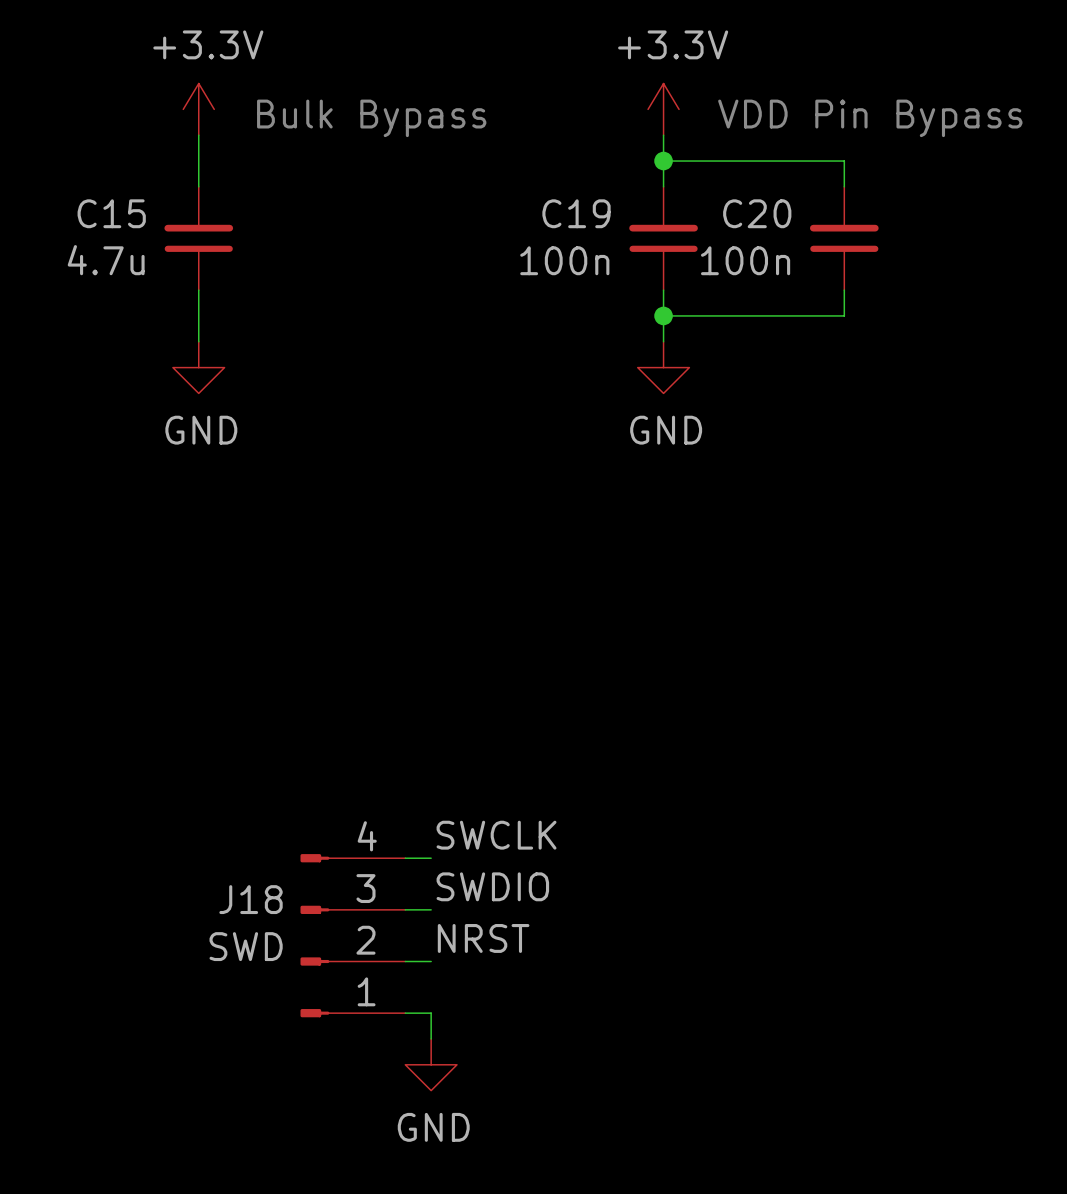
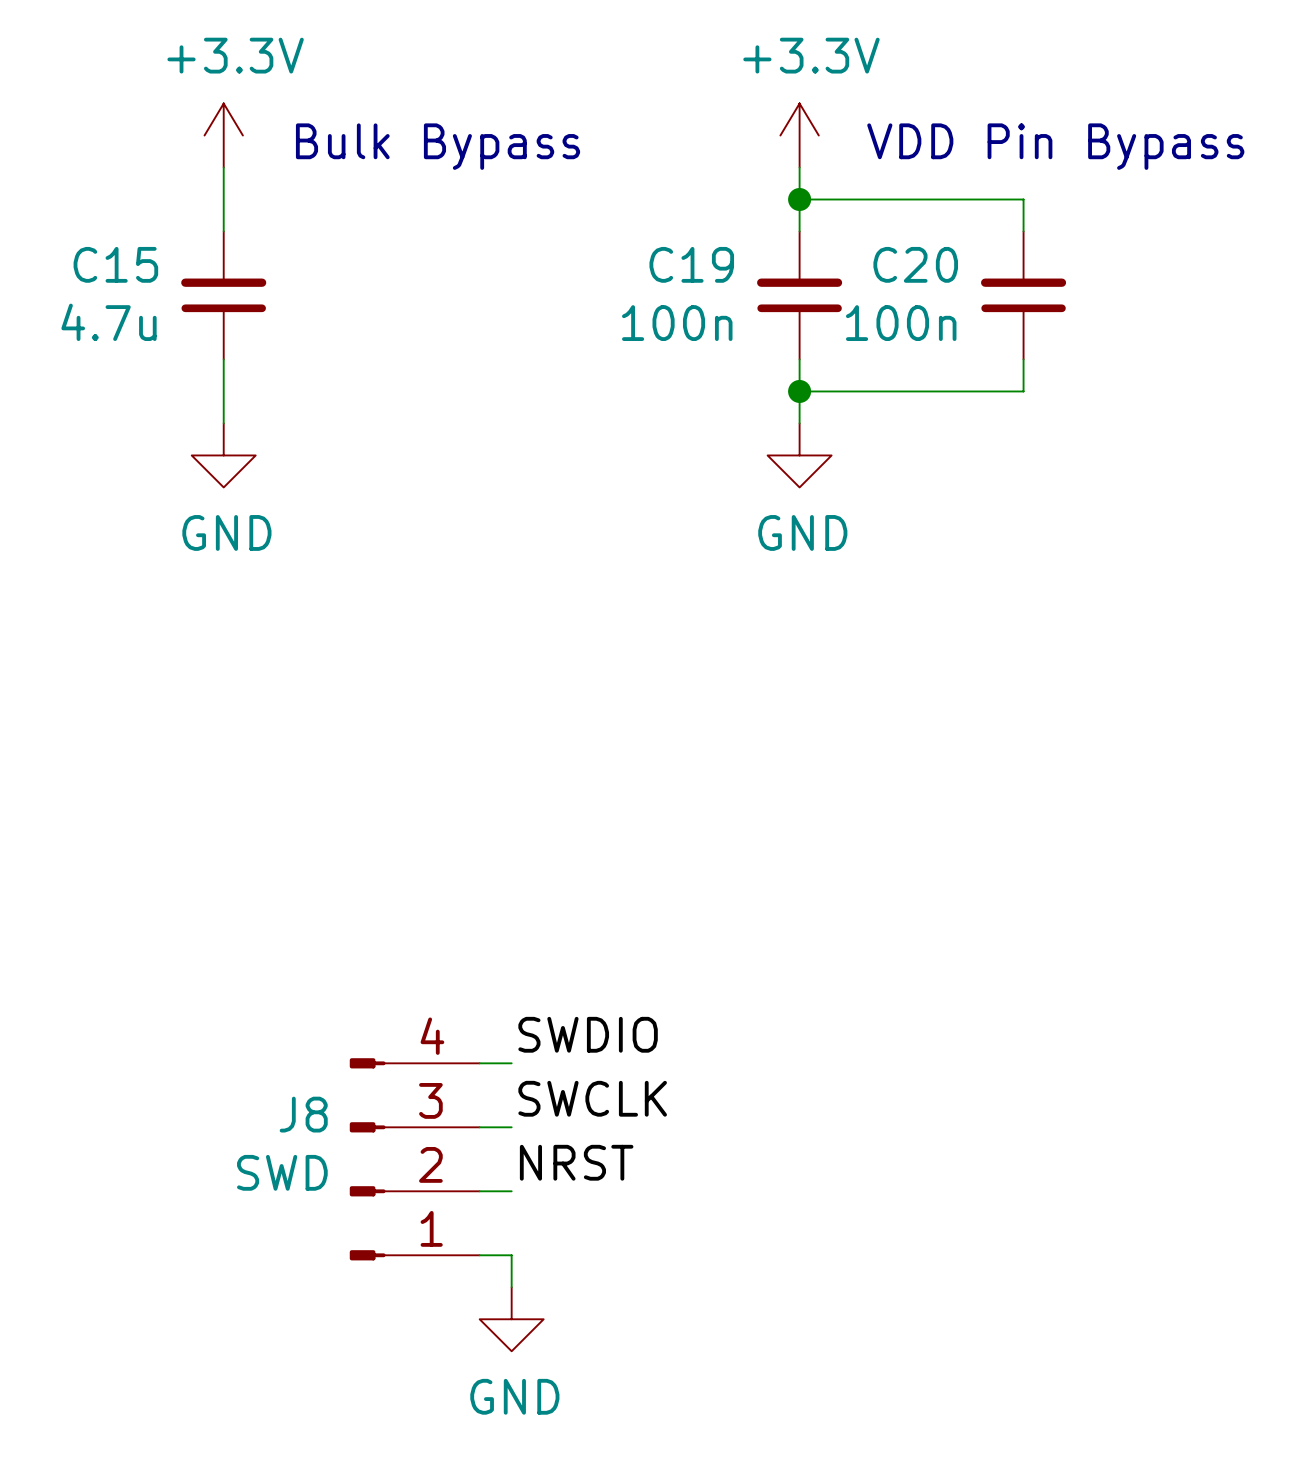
label: SWCLK (496, 835) -> SWDIO (588, 1034)
label: SWDIO (492, 886) -> SWCLK (592, 1098)
J18 name: J18 (251, 899) -> J8 (303, 1114)

